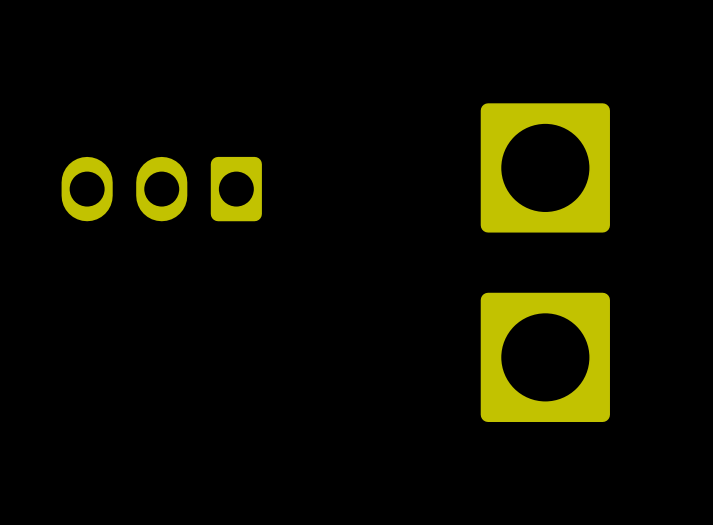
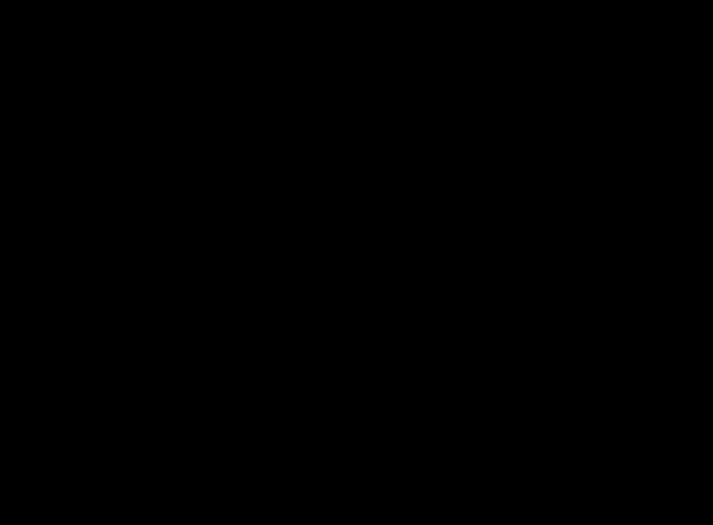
part: (545, 167) -> none
part: (161, 189) -> none
part: (545, 357) -> none

